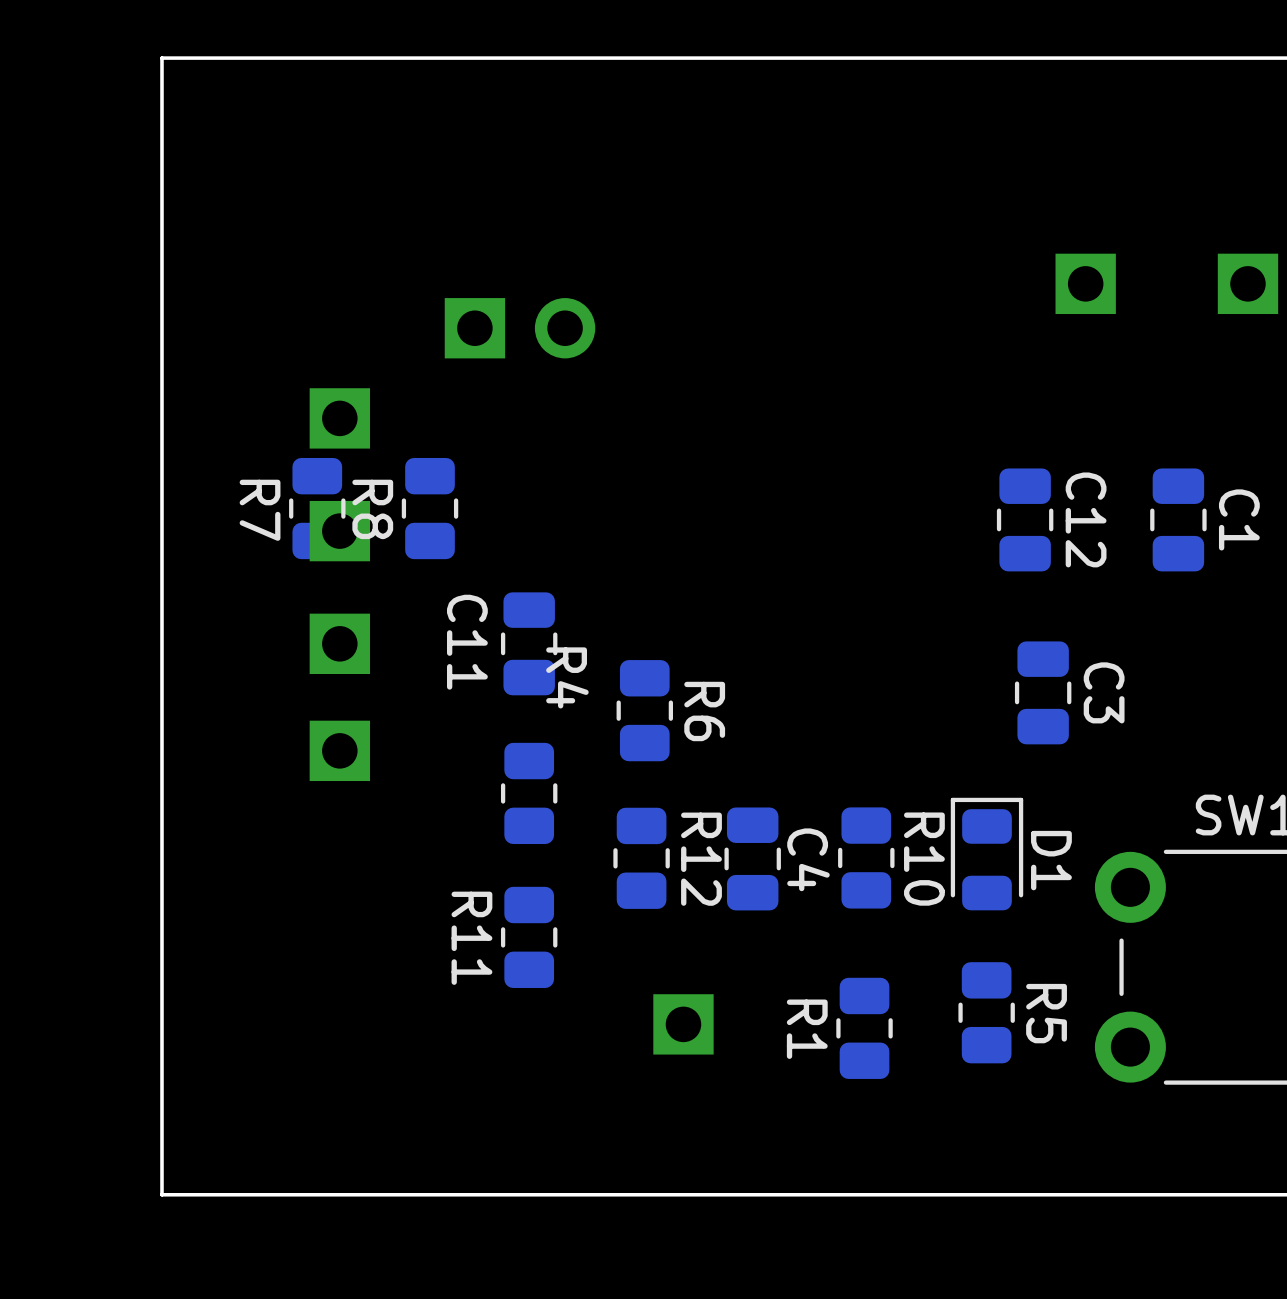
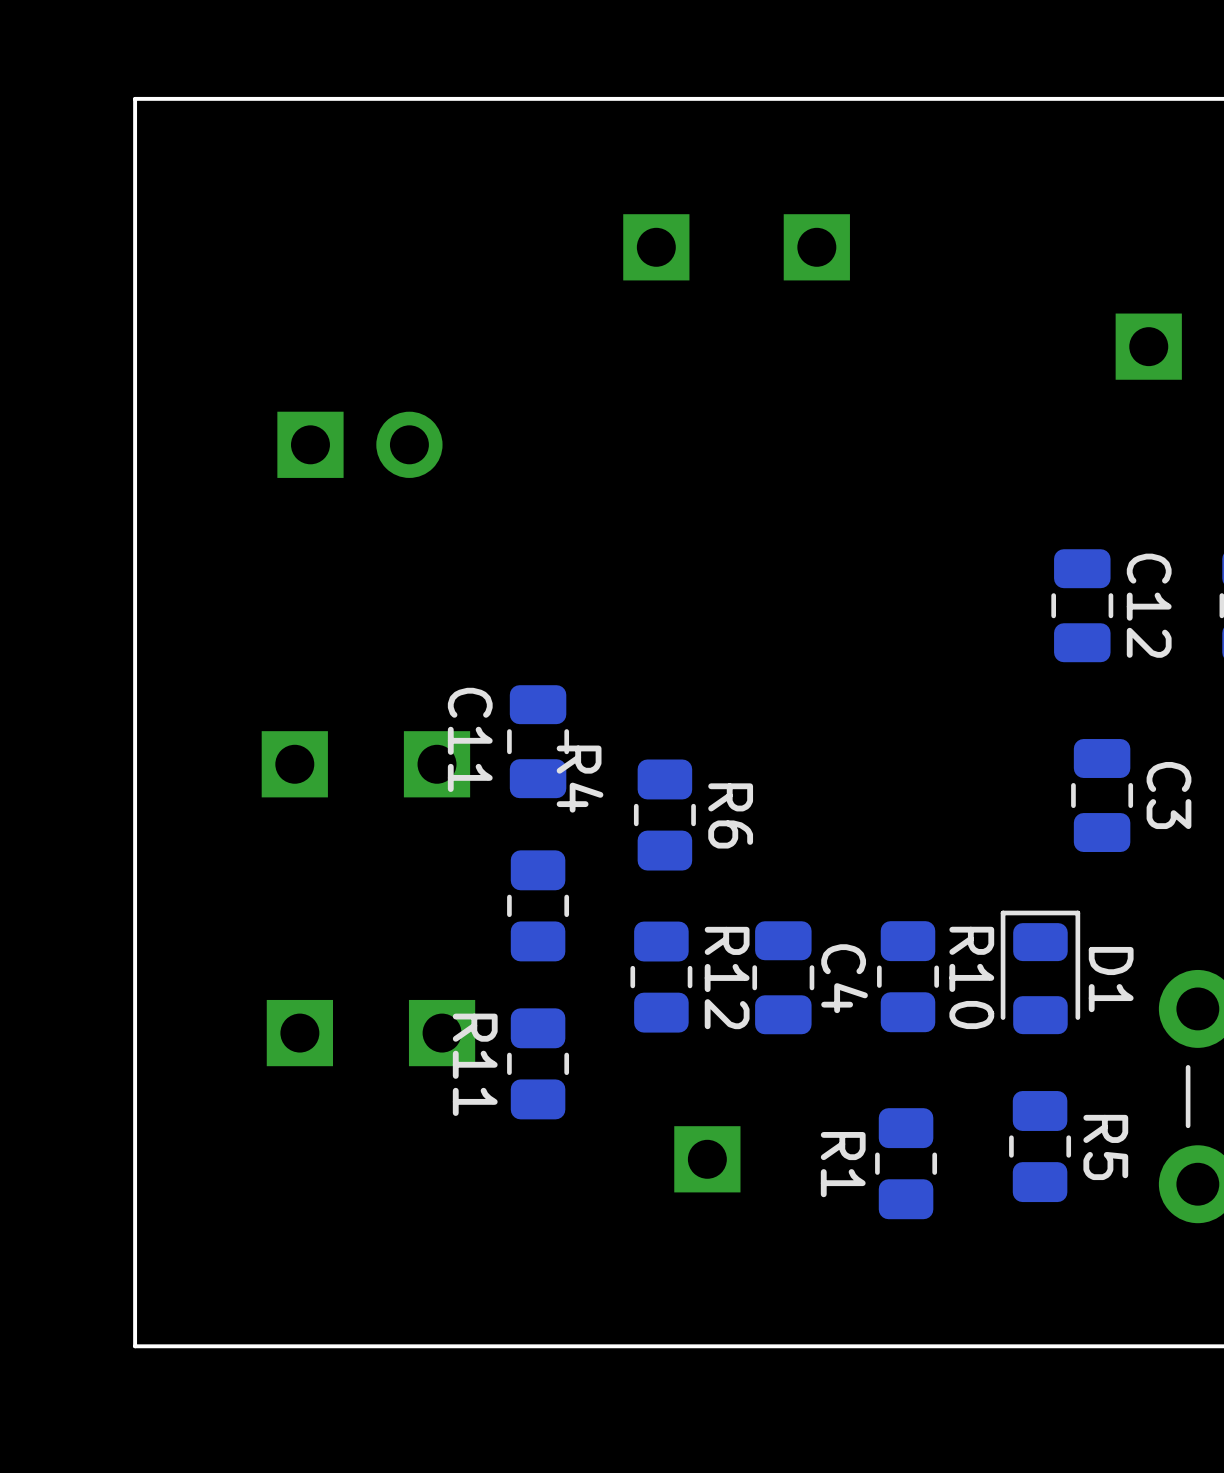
part: none -> (656, 247)
part: none -> (816, 247)
part position: (520, 328) -> (359, 444)
part: (339, 418) -> none
R7: (317, 508) -> none
R8: (430, 508) -> none
part: (339, 531) -> none
part position: (339, 643) -> (294, 764)
part: none -> (437, 764)
part: (339, 750) -> none
part: none -> (299, 1033)
part: none -> (442, 1033)

